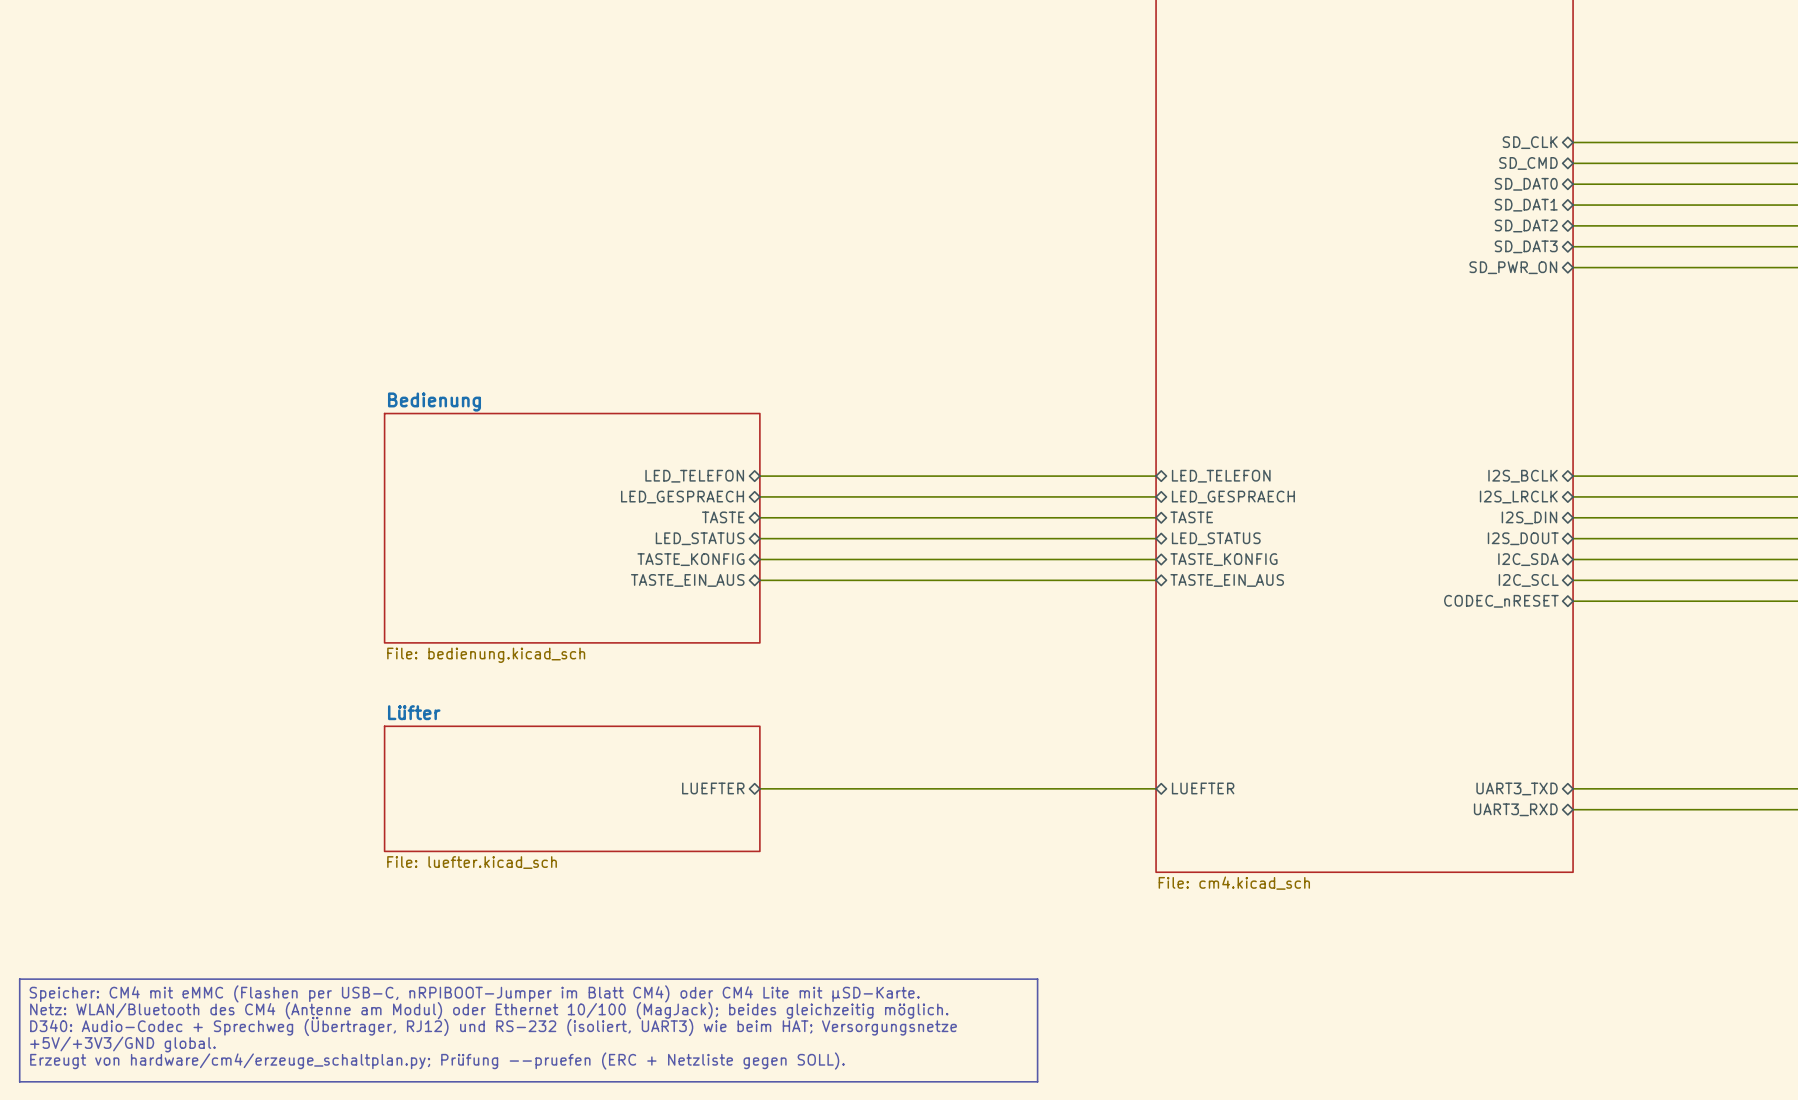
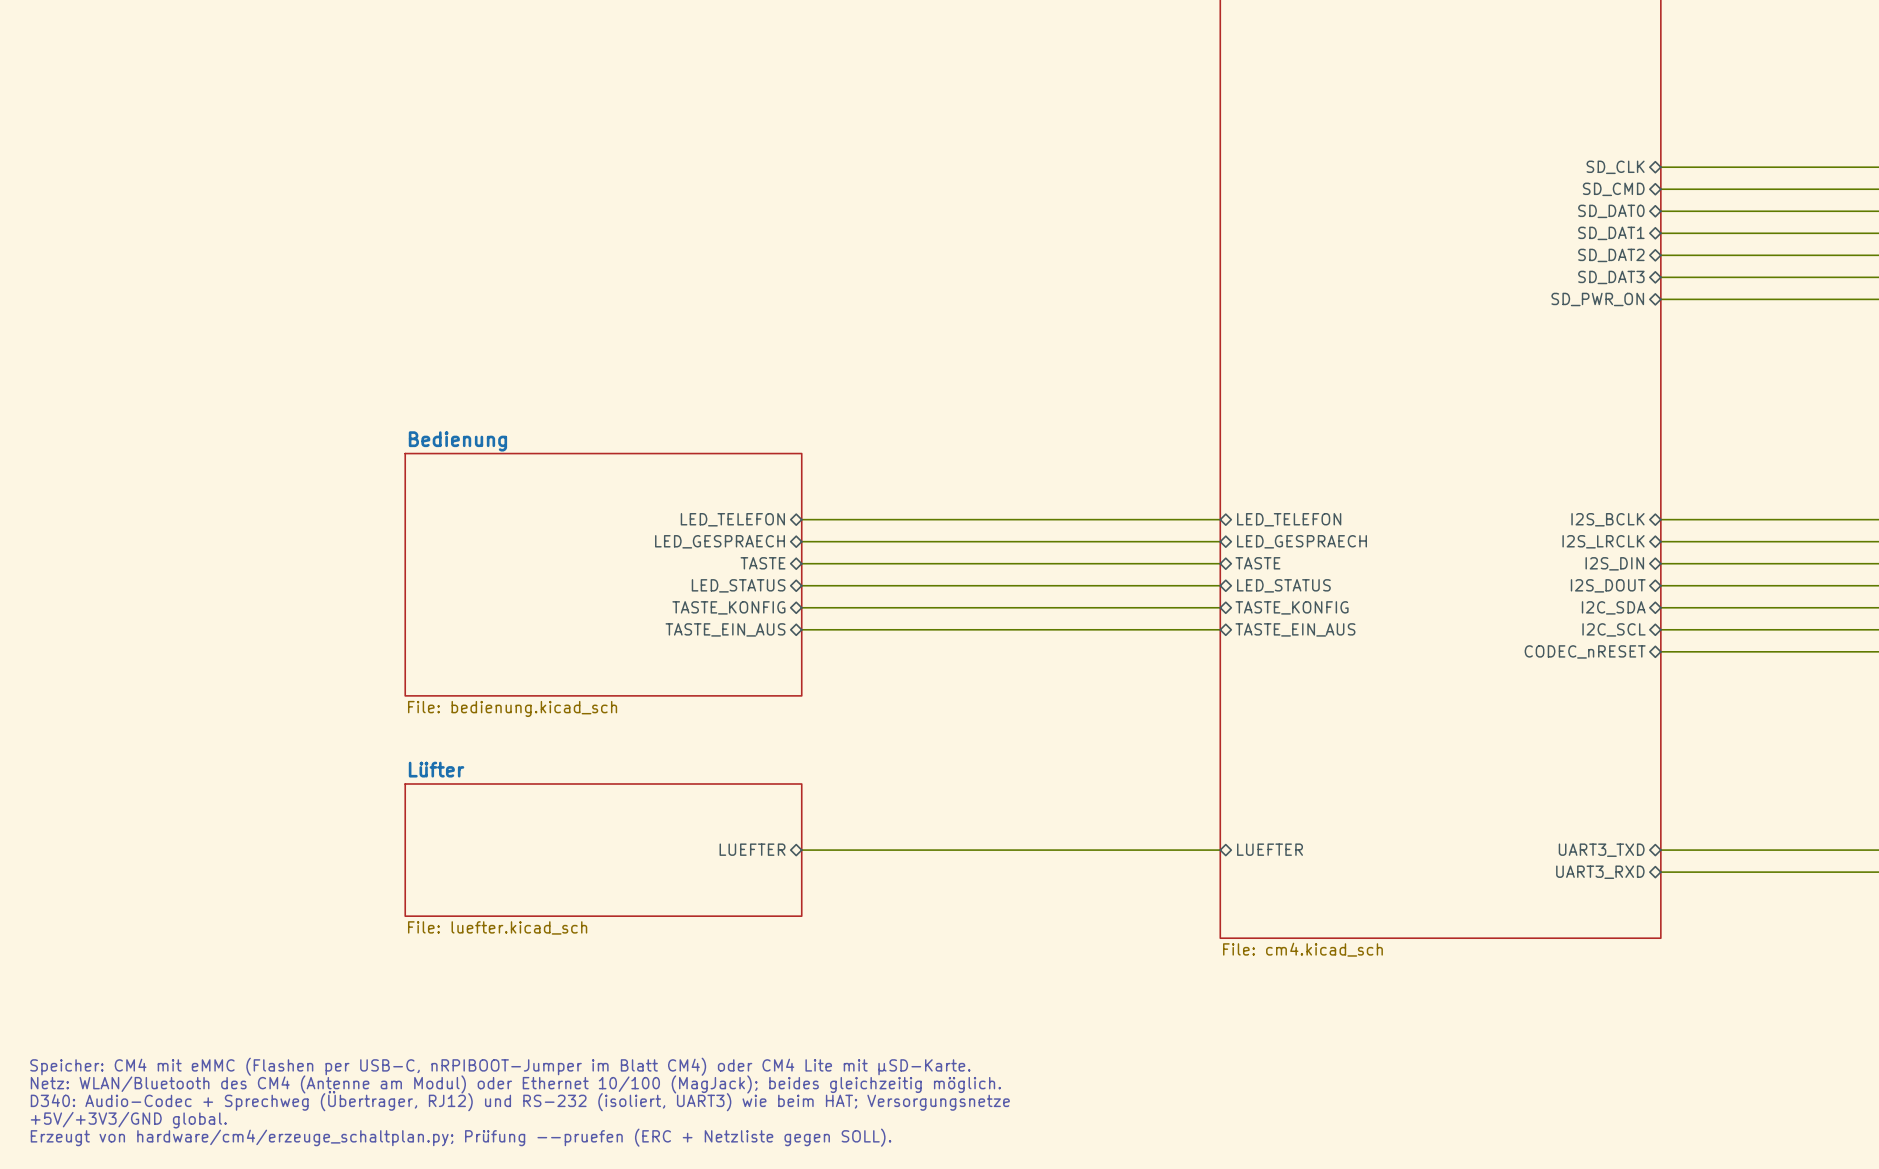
line: (19, 979) (1037, 979) (1037, 1081) (19, 1081) (19, 979) -> none

